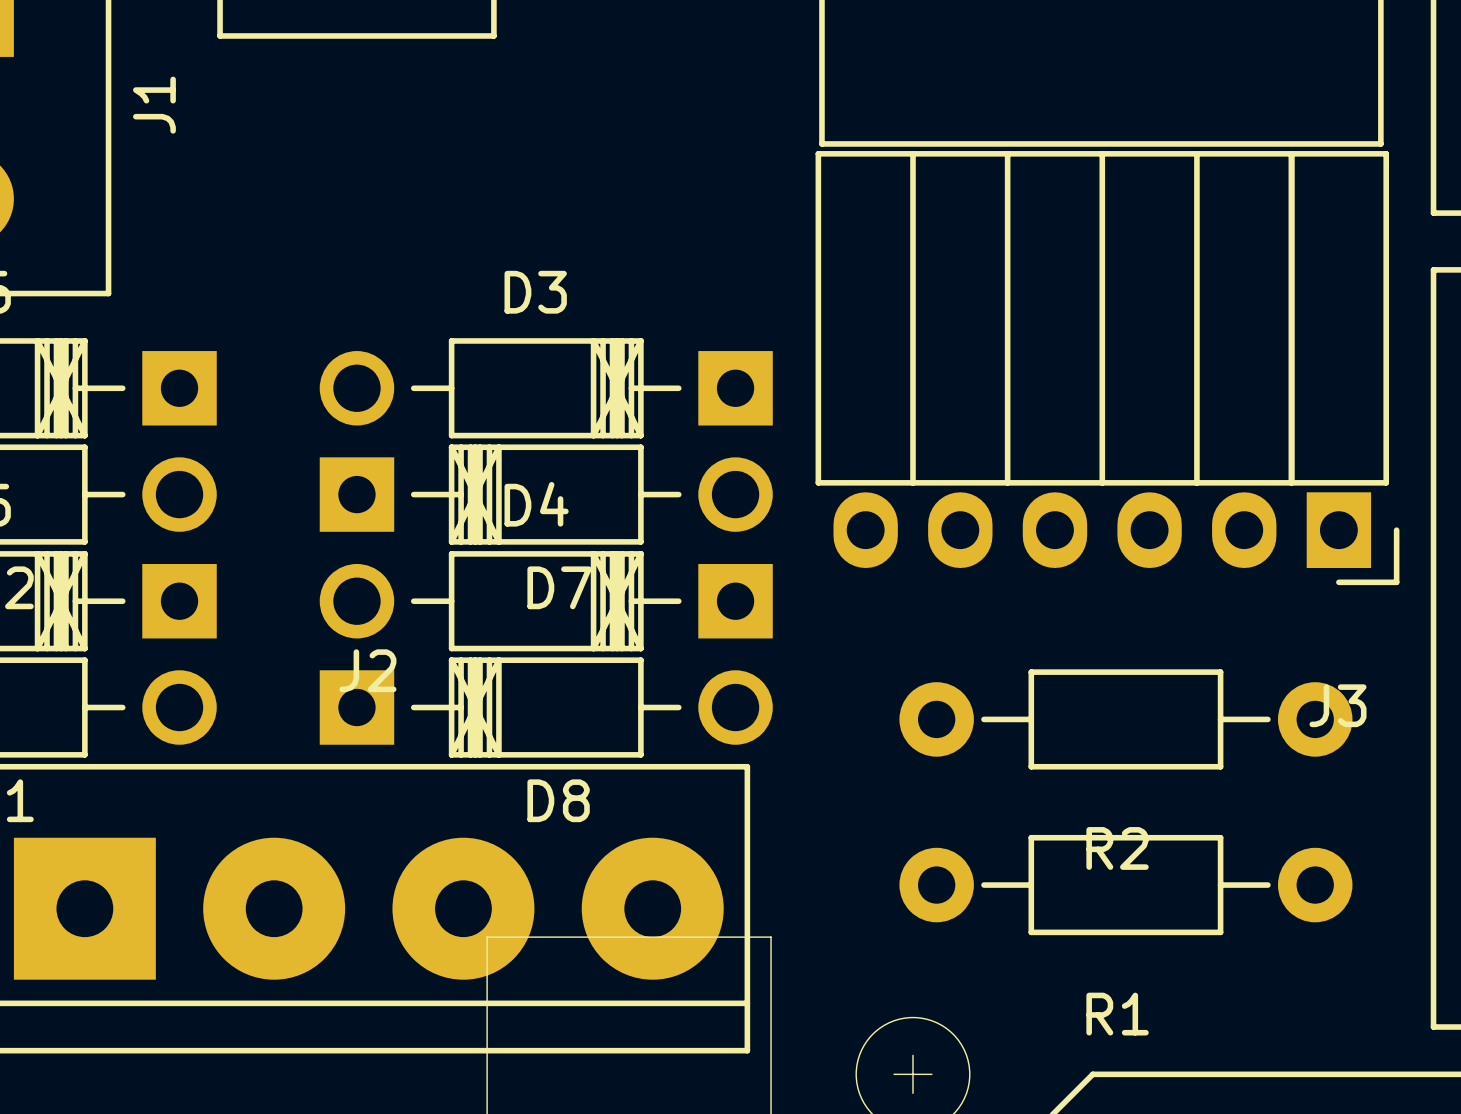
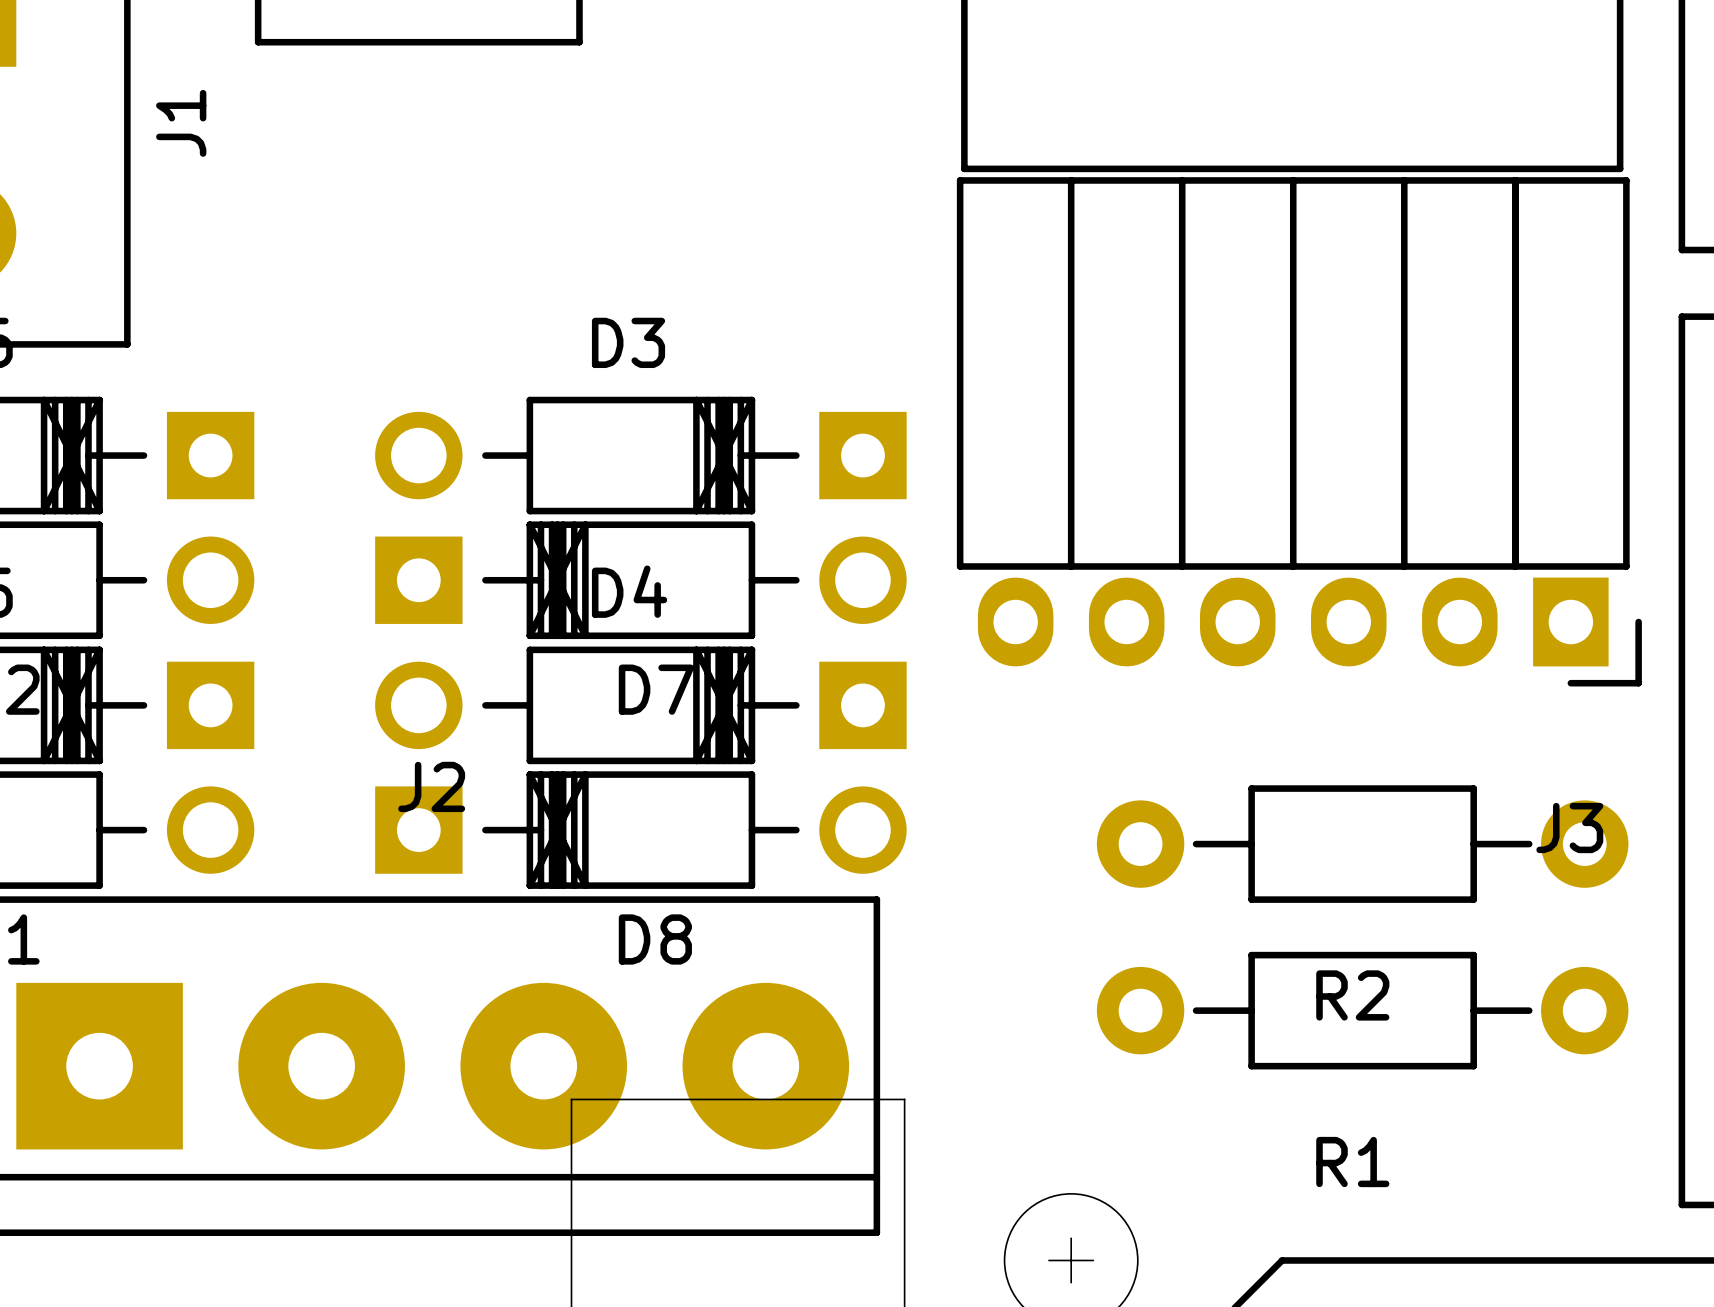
R2 position: (1125, 719) -> (1362, 844)
R1 position: (1125, 885) -> (1362, 1010)

